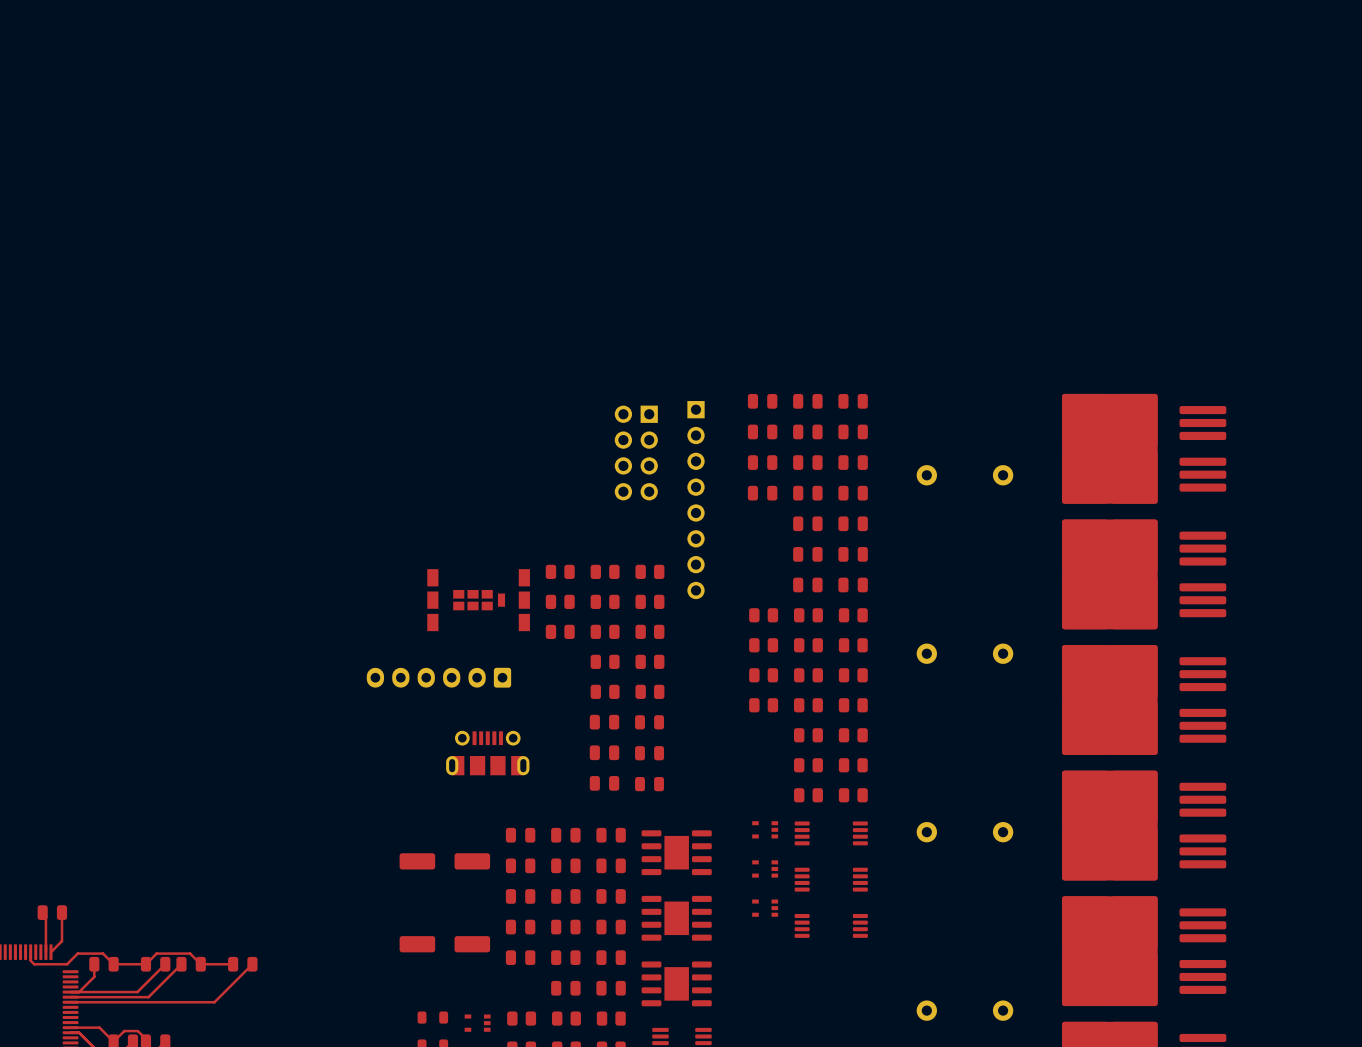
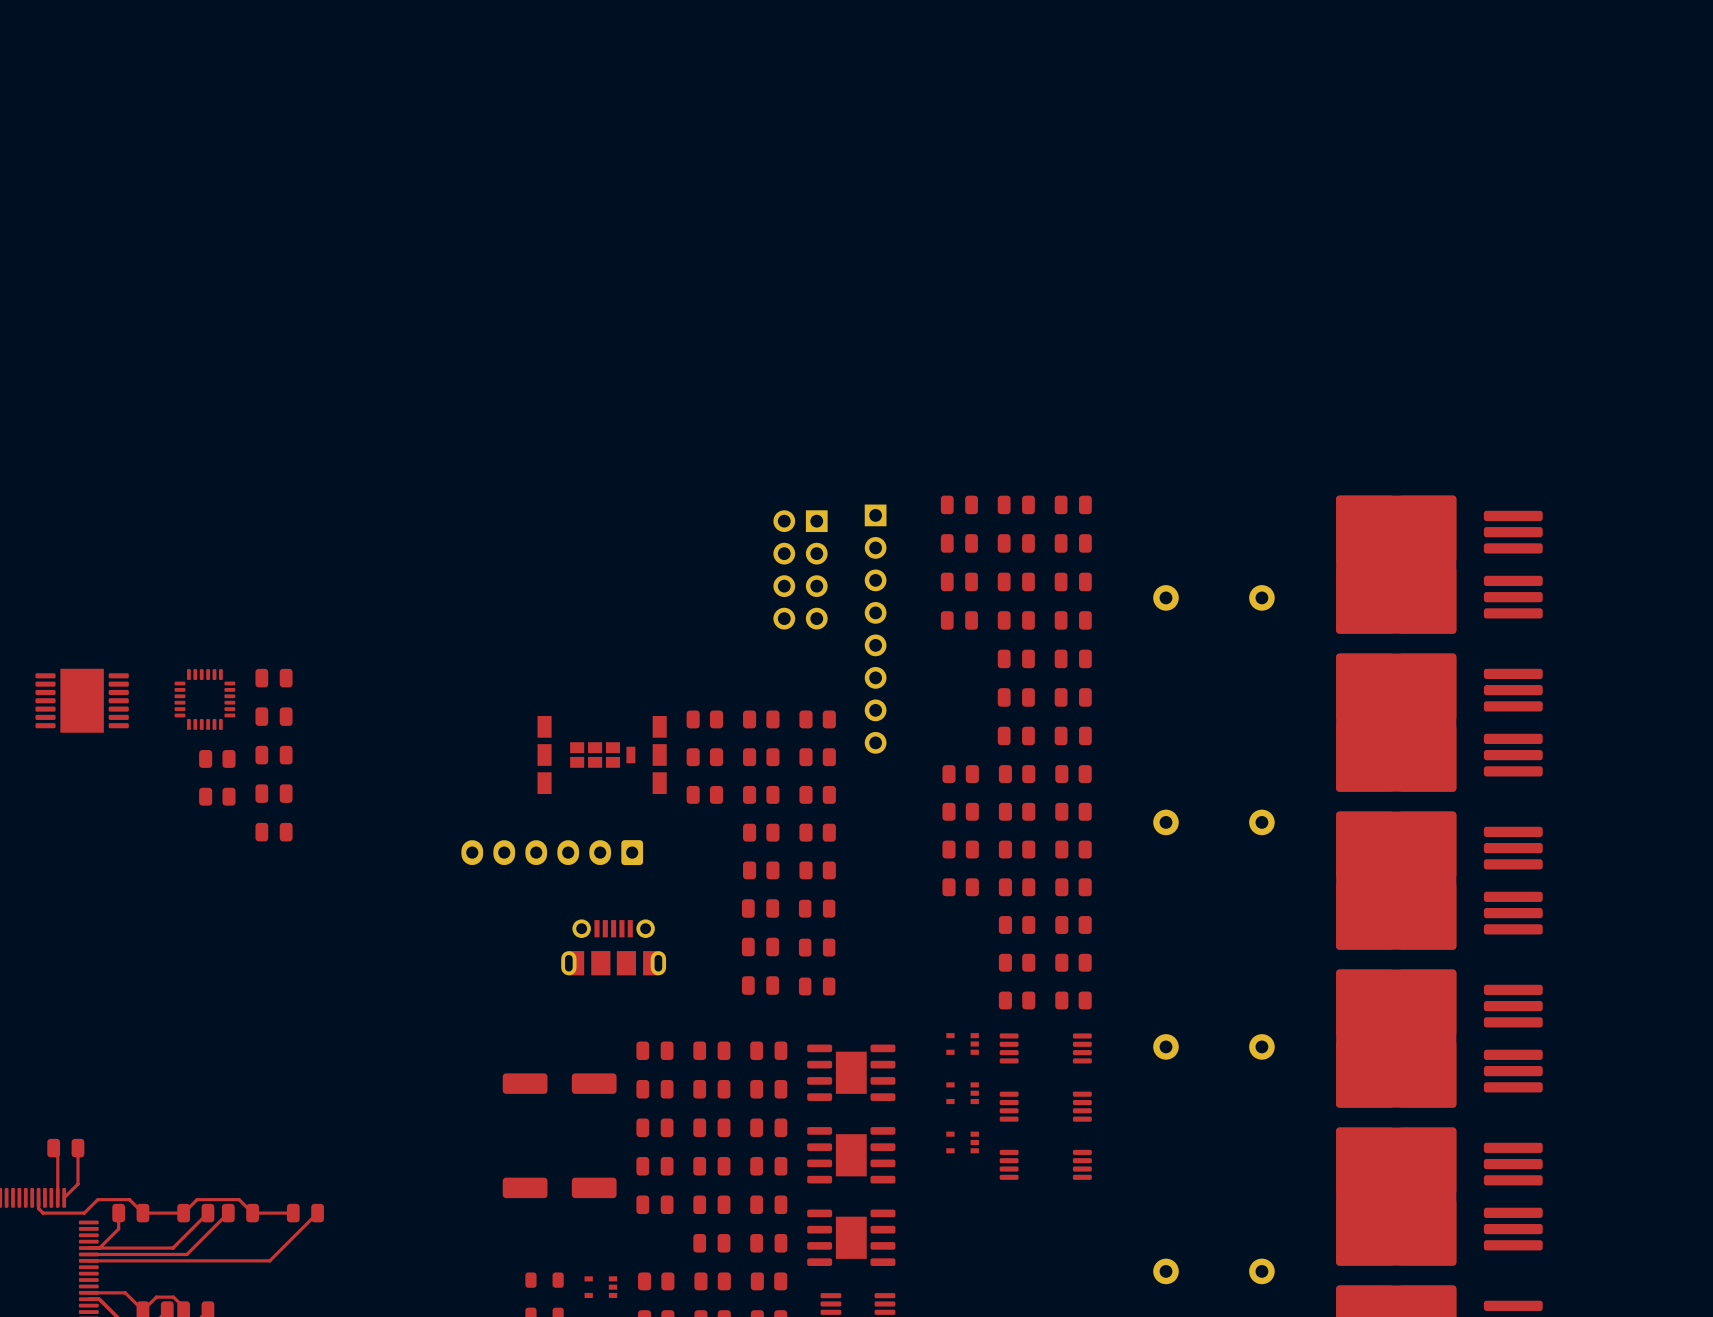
part: none -> (273, 678)
part: none -> (204, 699)
part: none -> (82, 700)
part: none -> (273, 716)
part: none -> (273, 755)
part: none -> (217, 758)
part: none -> (273, 793)
part: none -> (217, 796)
part: none -> (273, 832)

